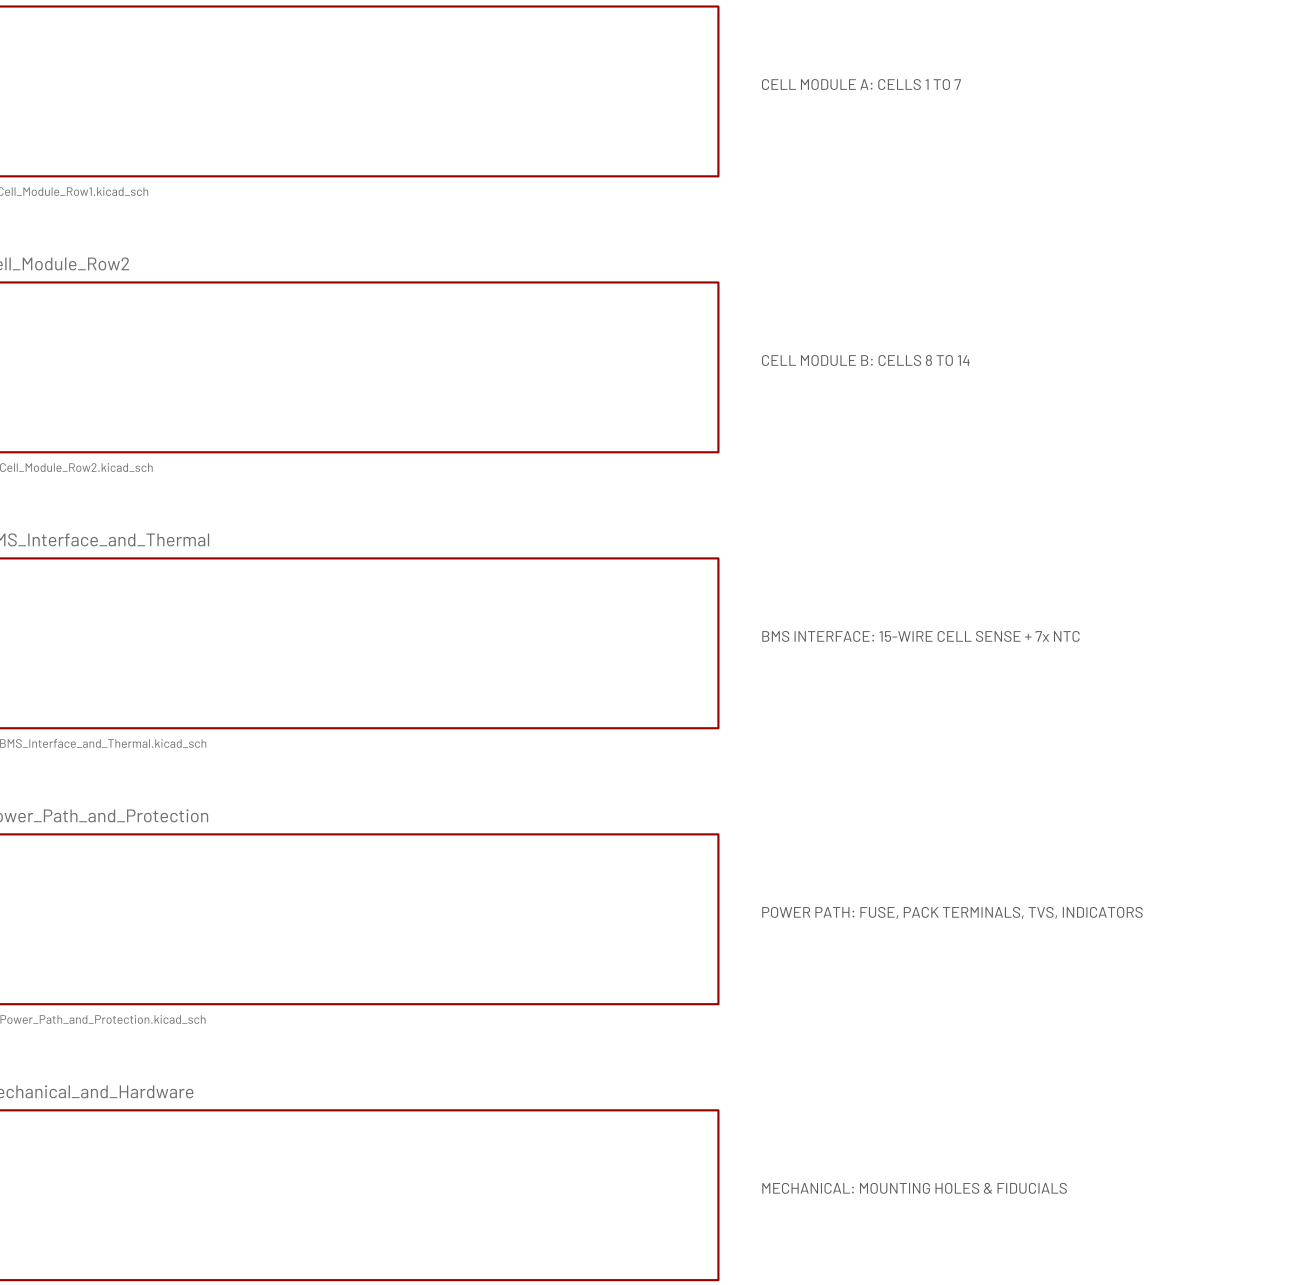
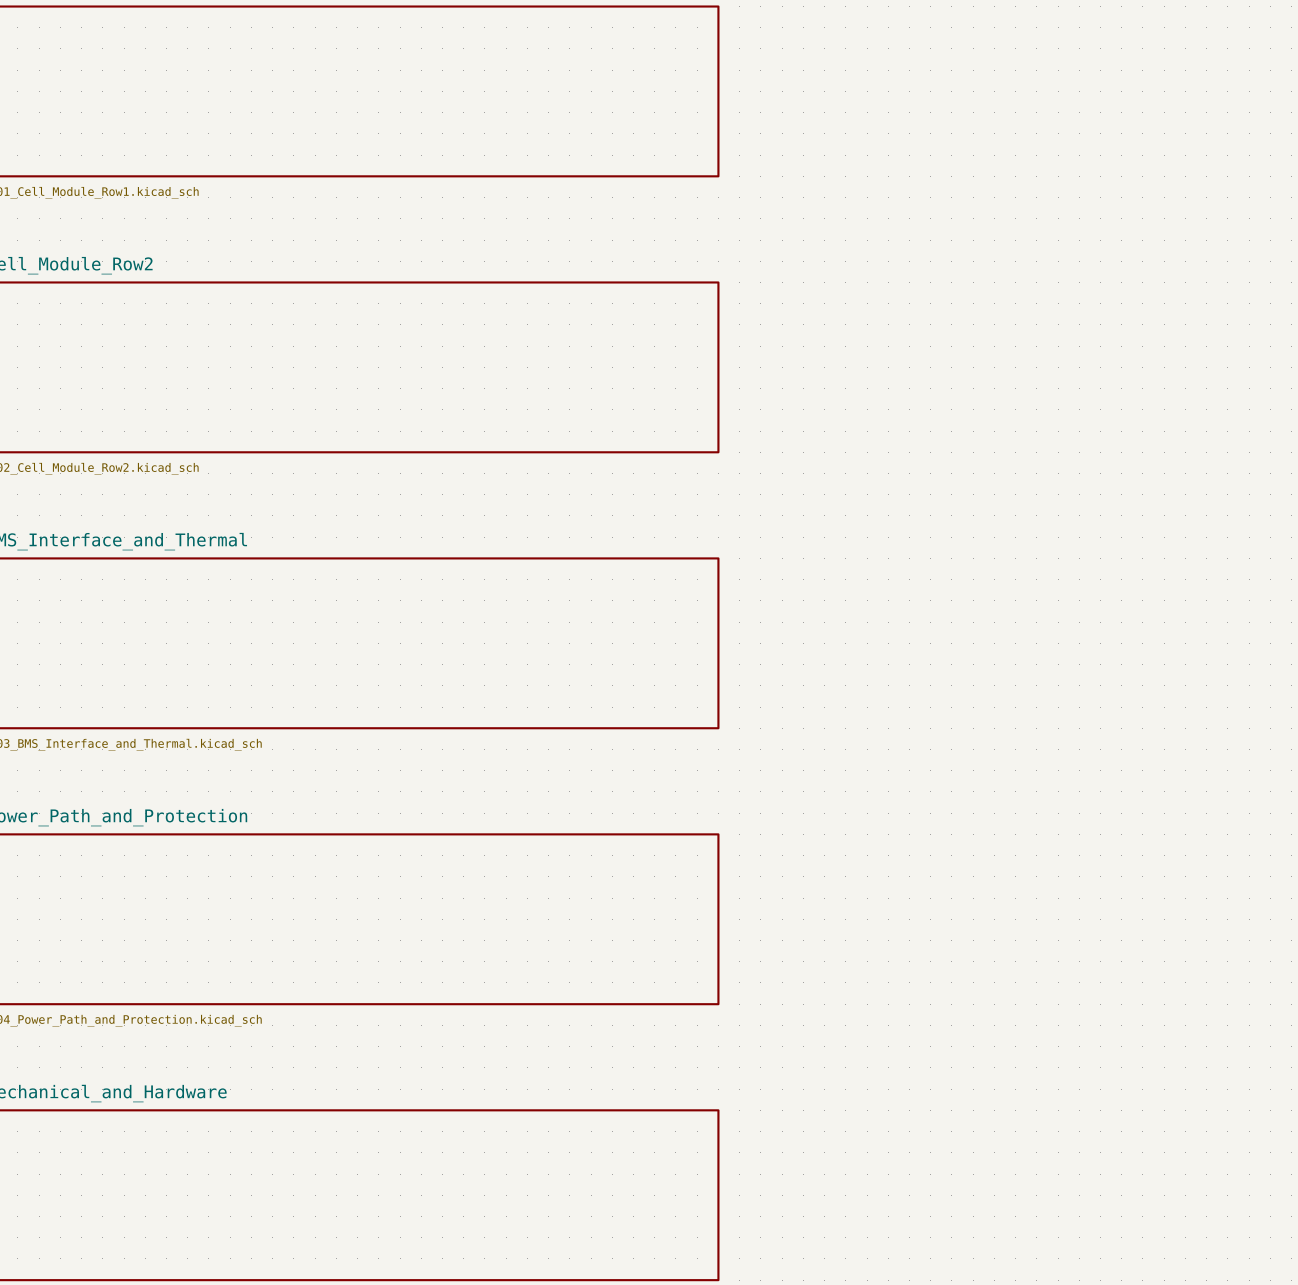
text: CELL MODULE A: CELLS 1 TO 7 (861, 84) -> none
text: CELL MODULE B: CELLS 8 TO 14 (865, 360) -> none
text: BMS INTERFACE: 15-WIRE CELL SENSE + 7x NTC (920, 636) -> none
text: POWER PATH: FUSE, PACK TERMINALS, TVS, INDICATORS (952, 912) -> none
text: MECHANICAL: MOUNTING HOLES & FIDUCIALS (914, 1188) -> none

